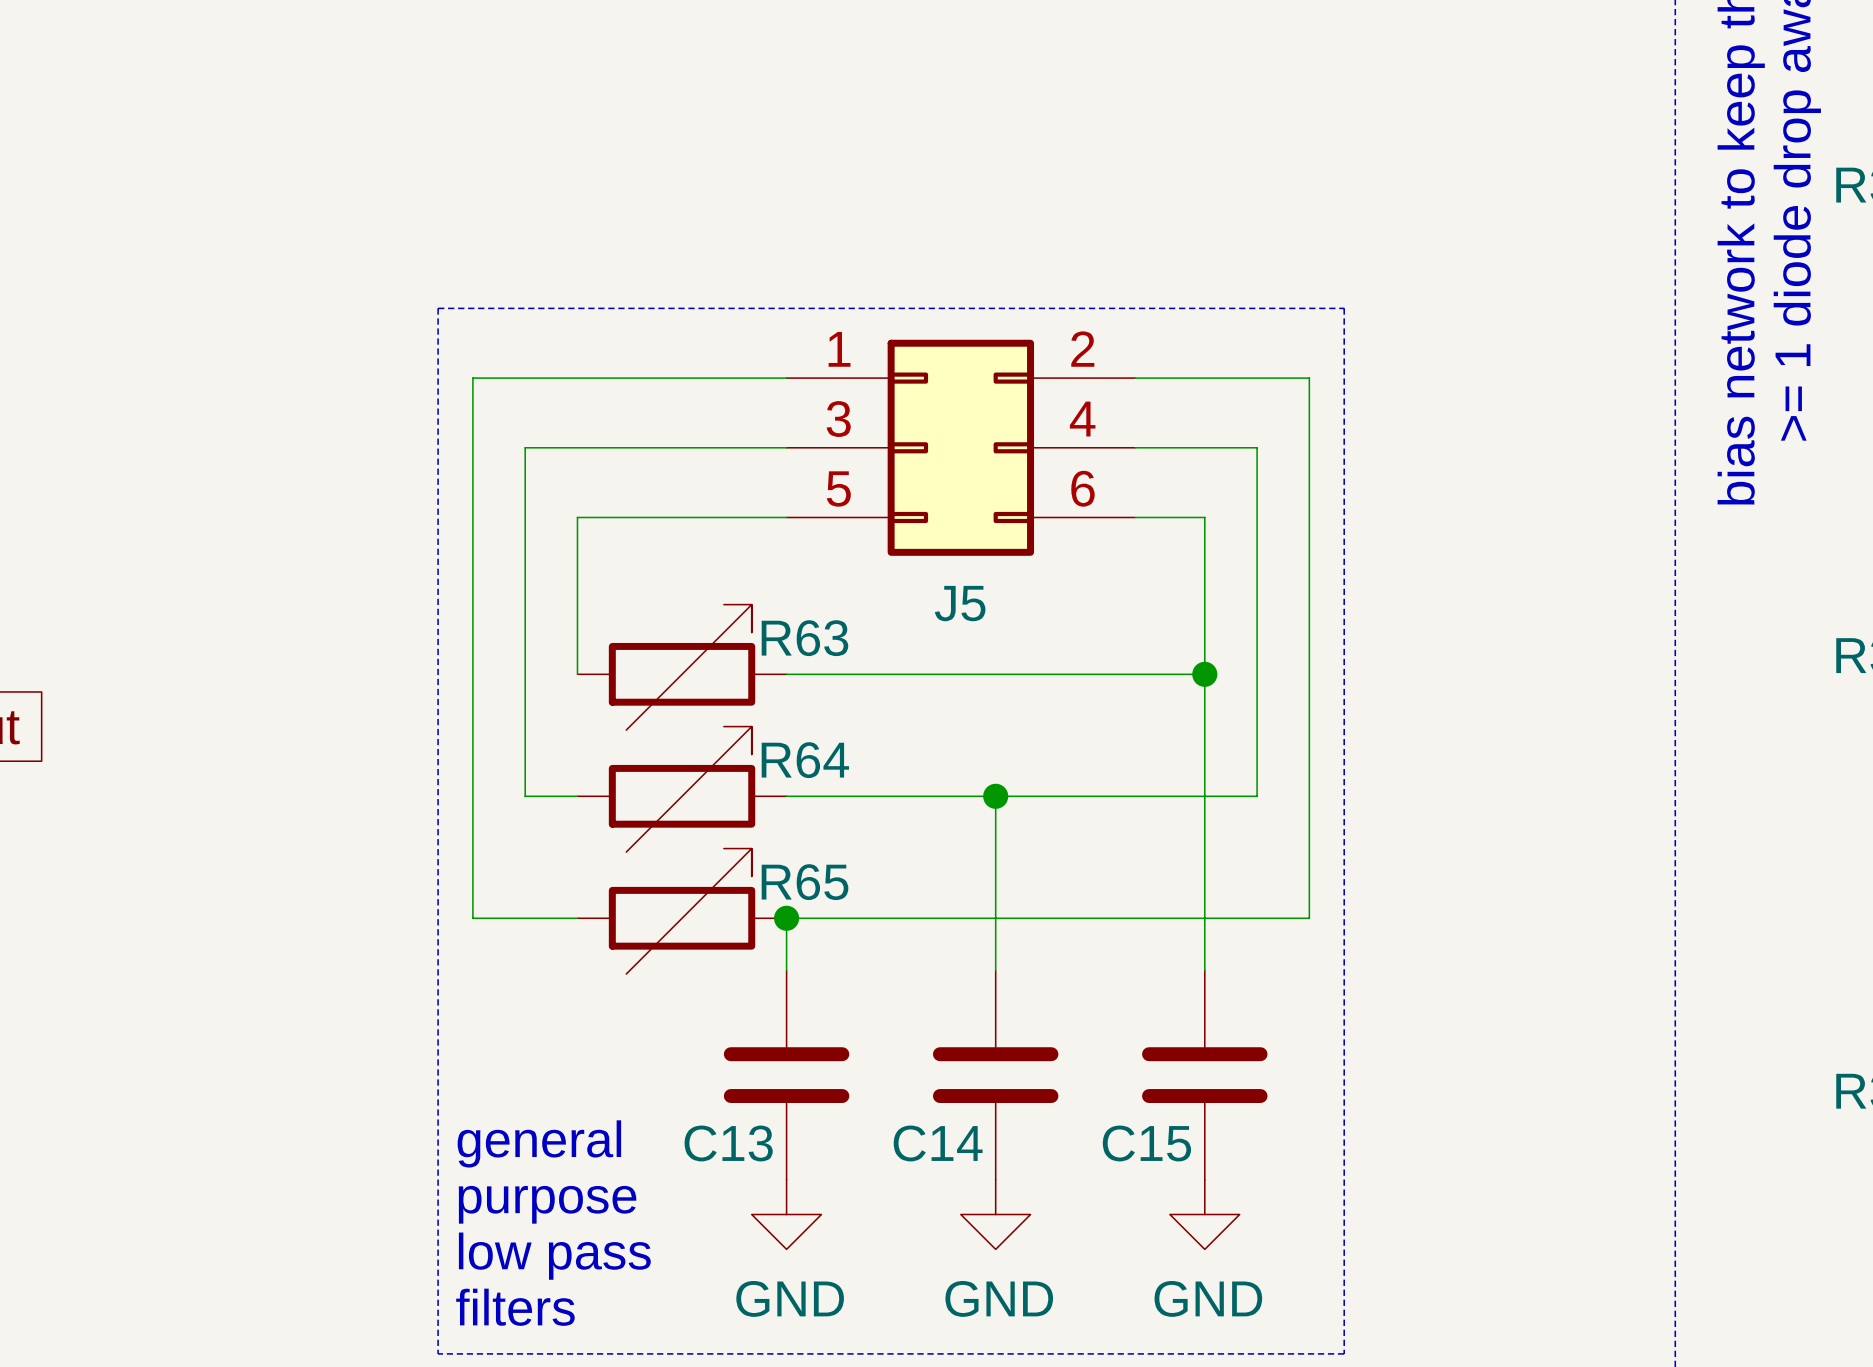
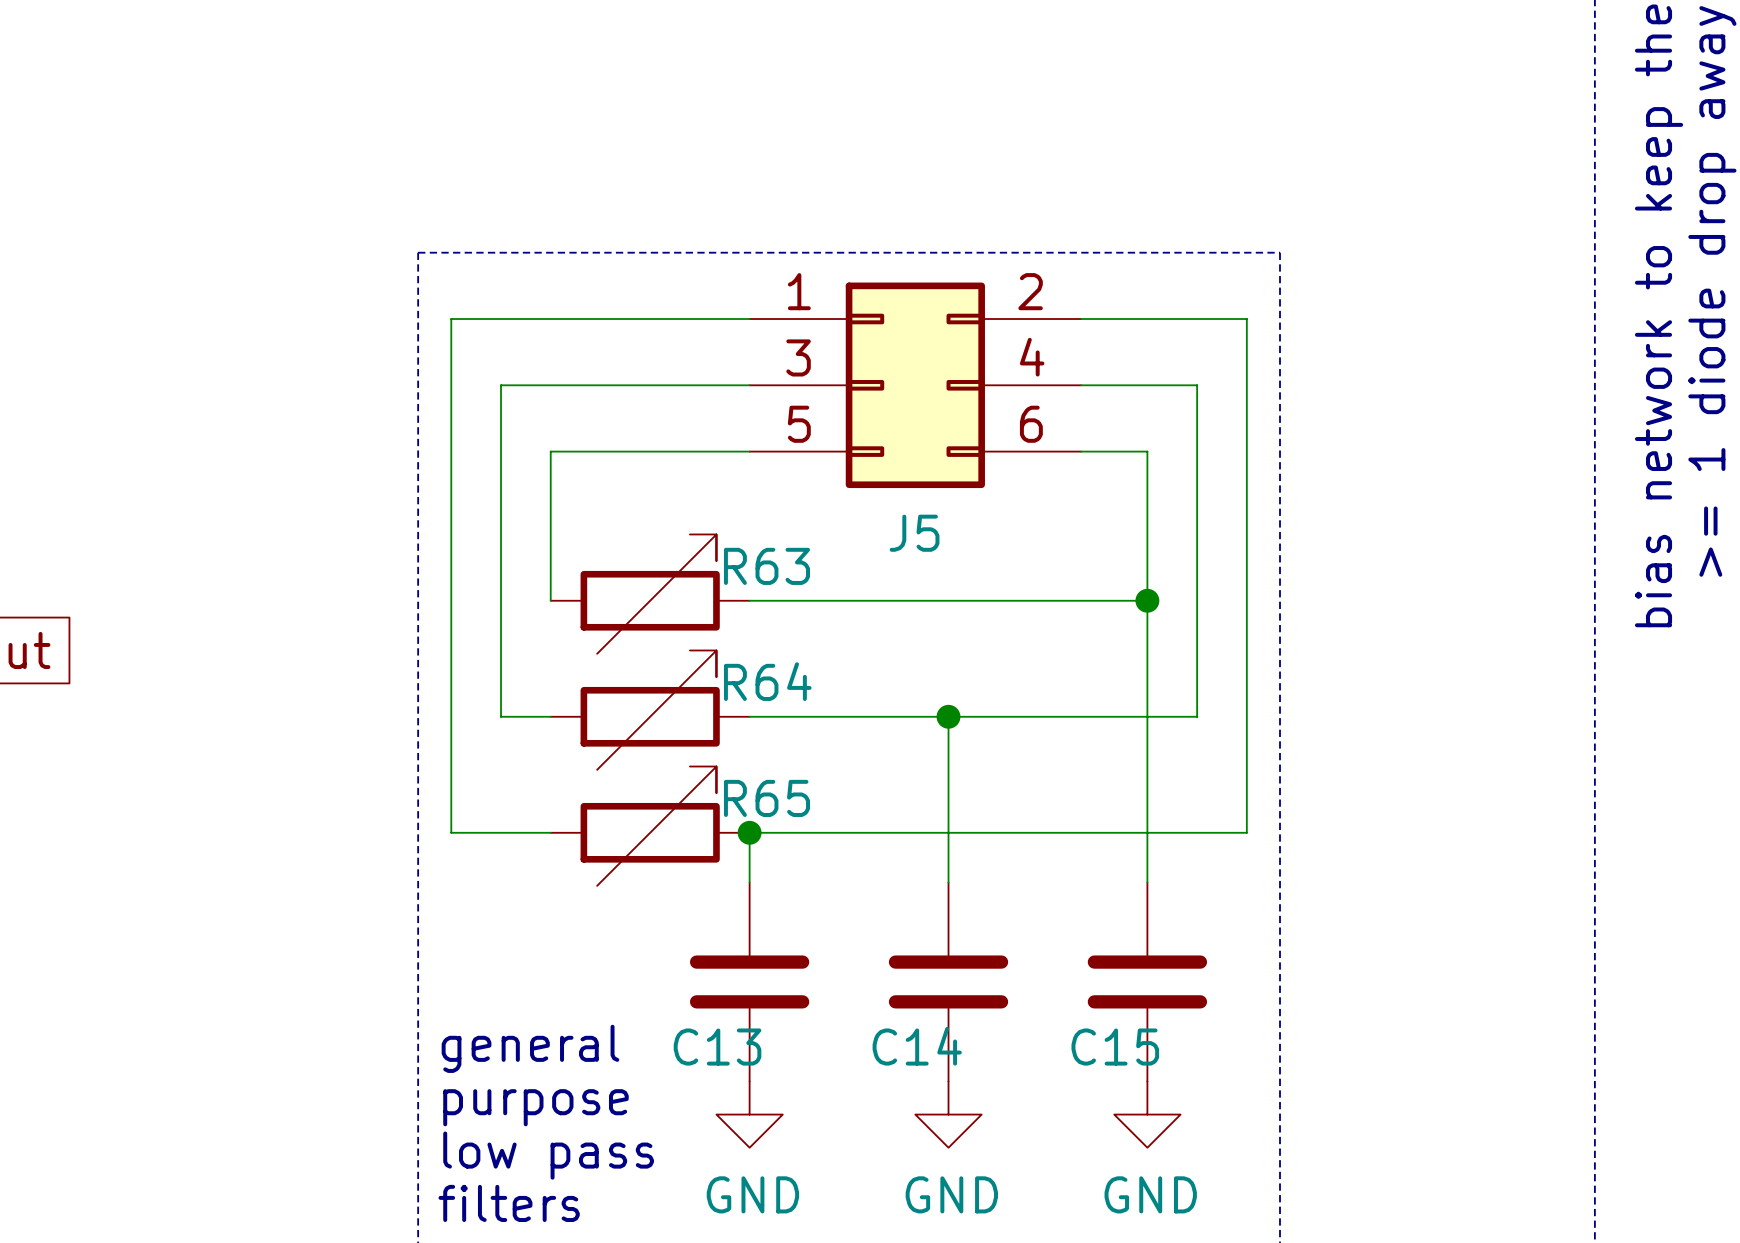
C13 name position: C13 (728, 1143) -> C13 (717, 1047)
C14 name position: C14 (938, 1143) -> C14 (917, 1046)
C15 name position: C15 (1146, 1143) -> C15 (1115, 1047)

